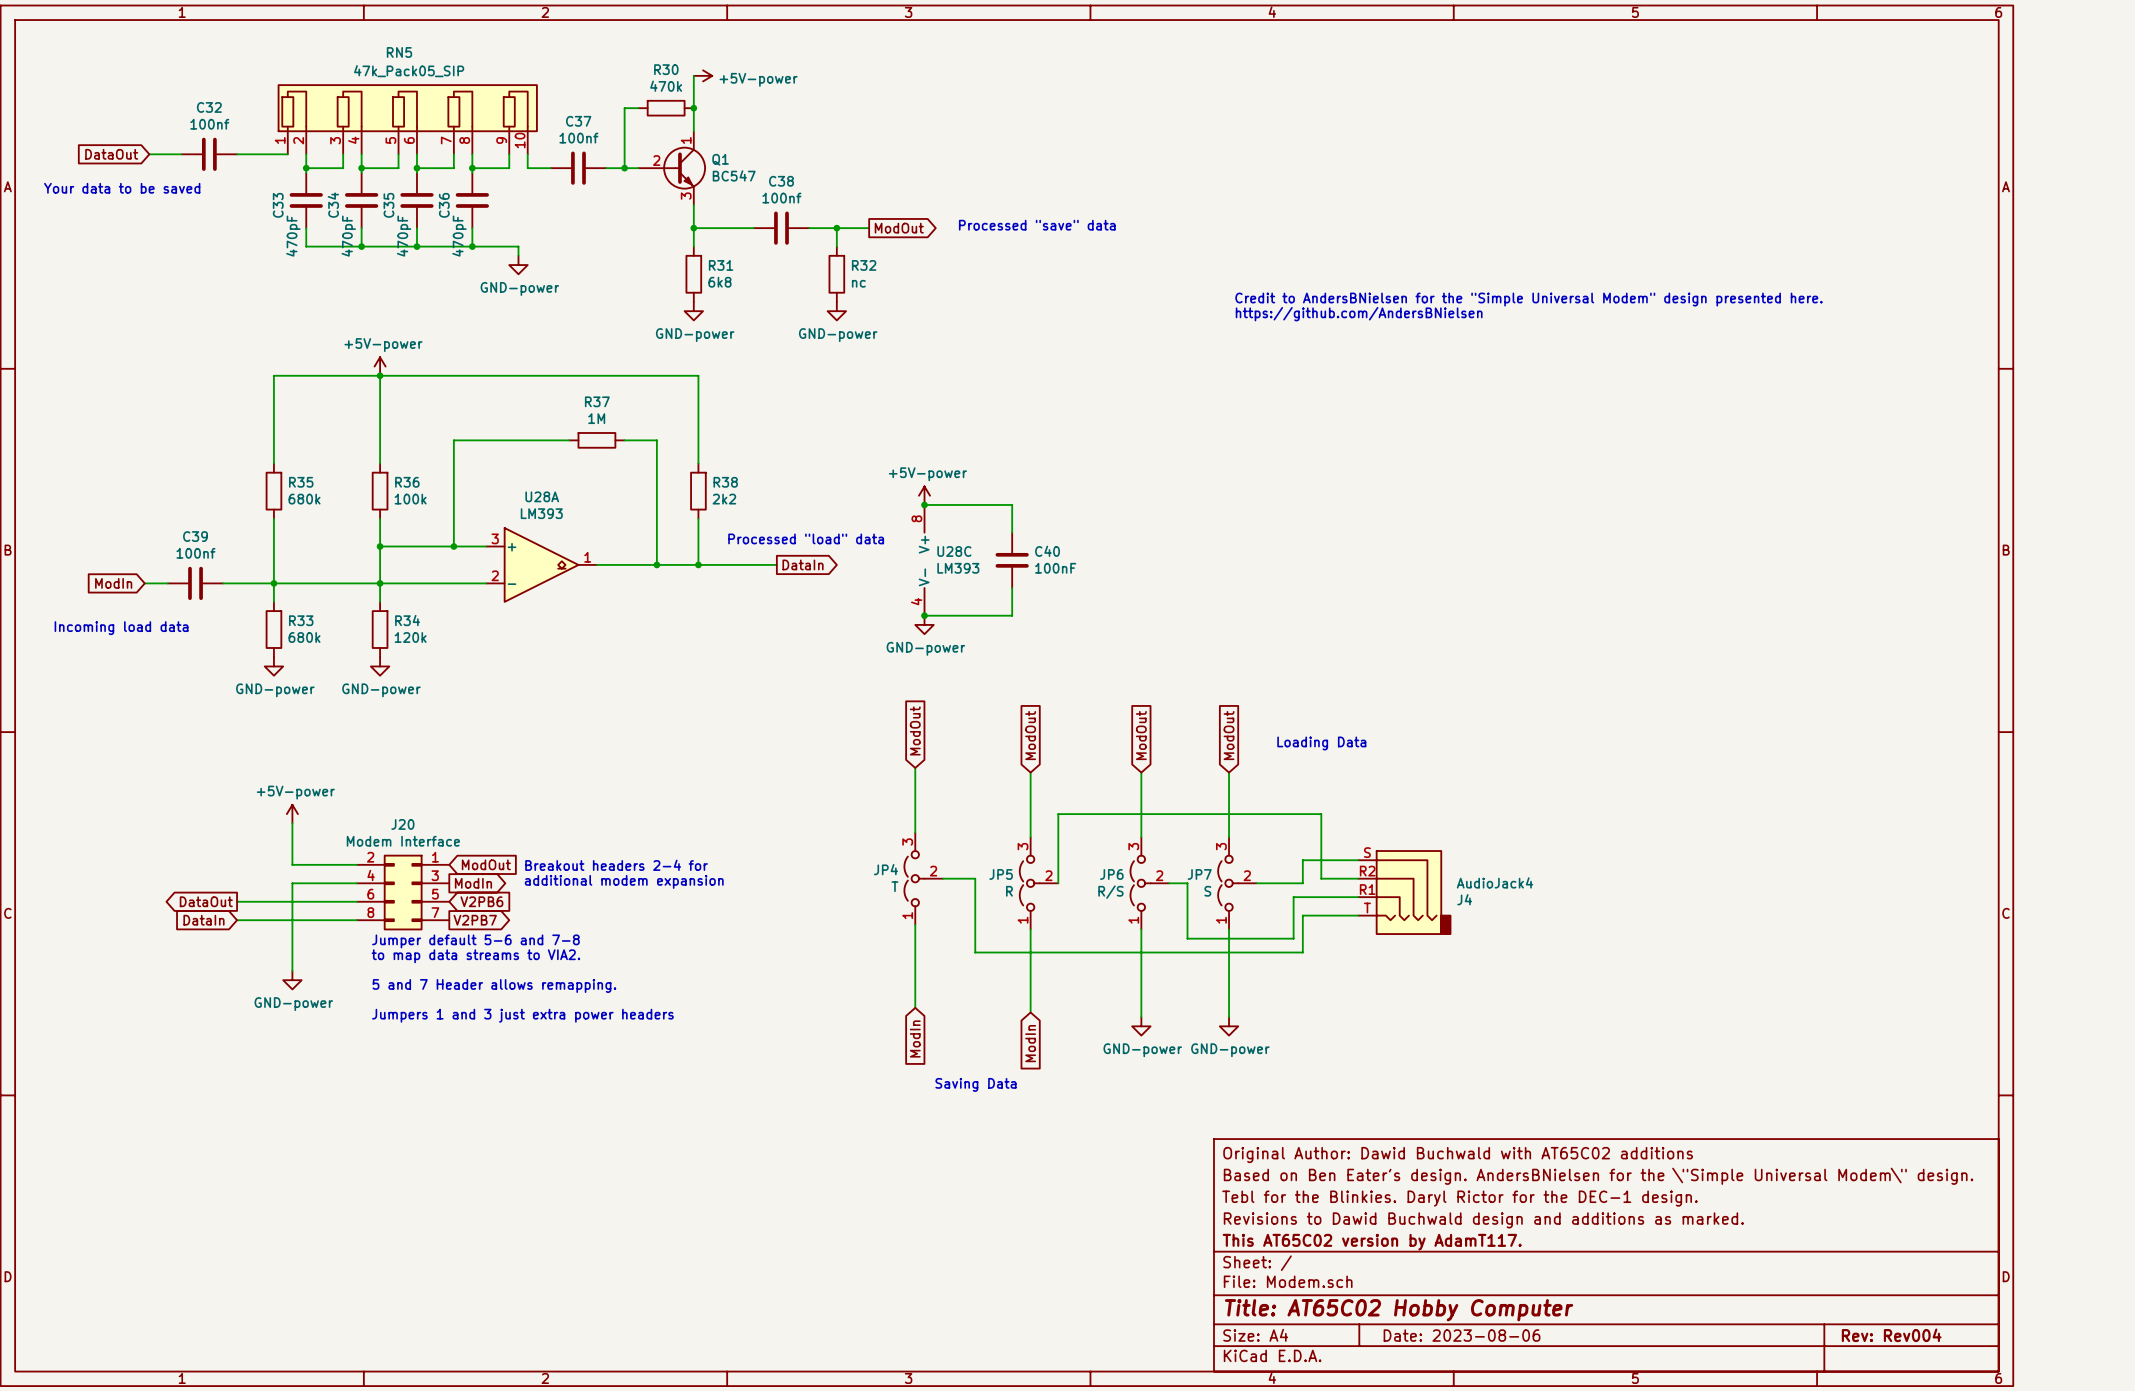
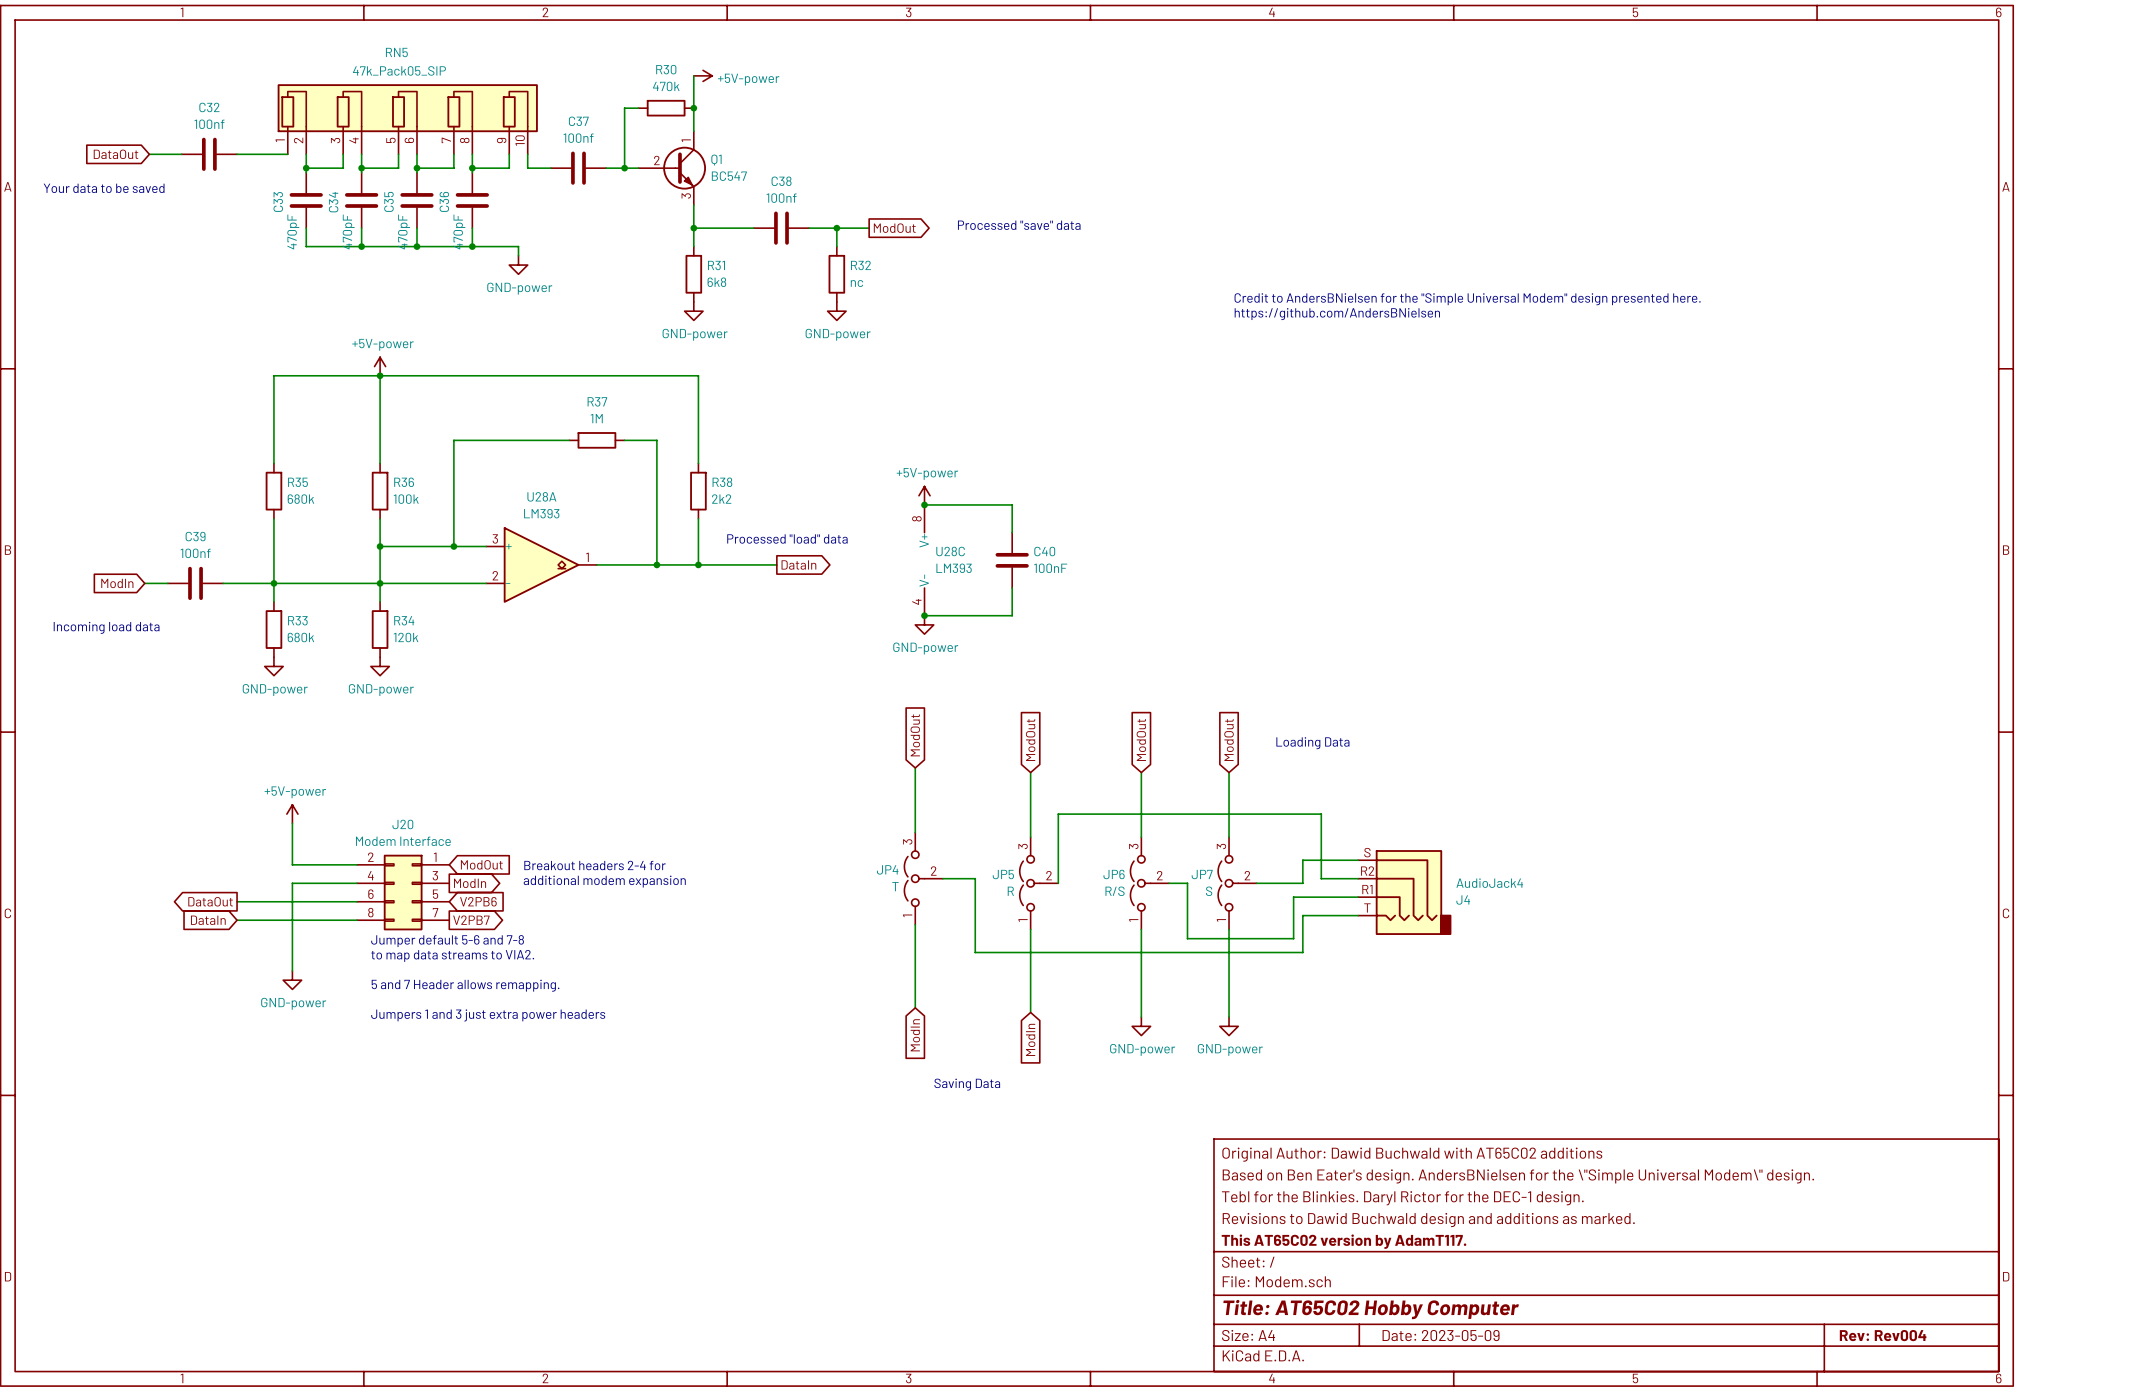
title block: Date: 2023-08-06 (1462, 1335) -> Date: 2023-05-09 (1441, 1335)

